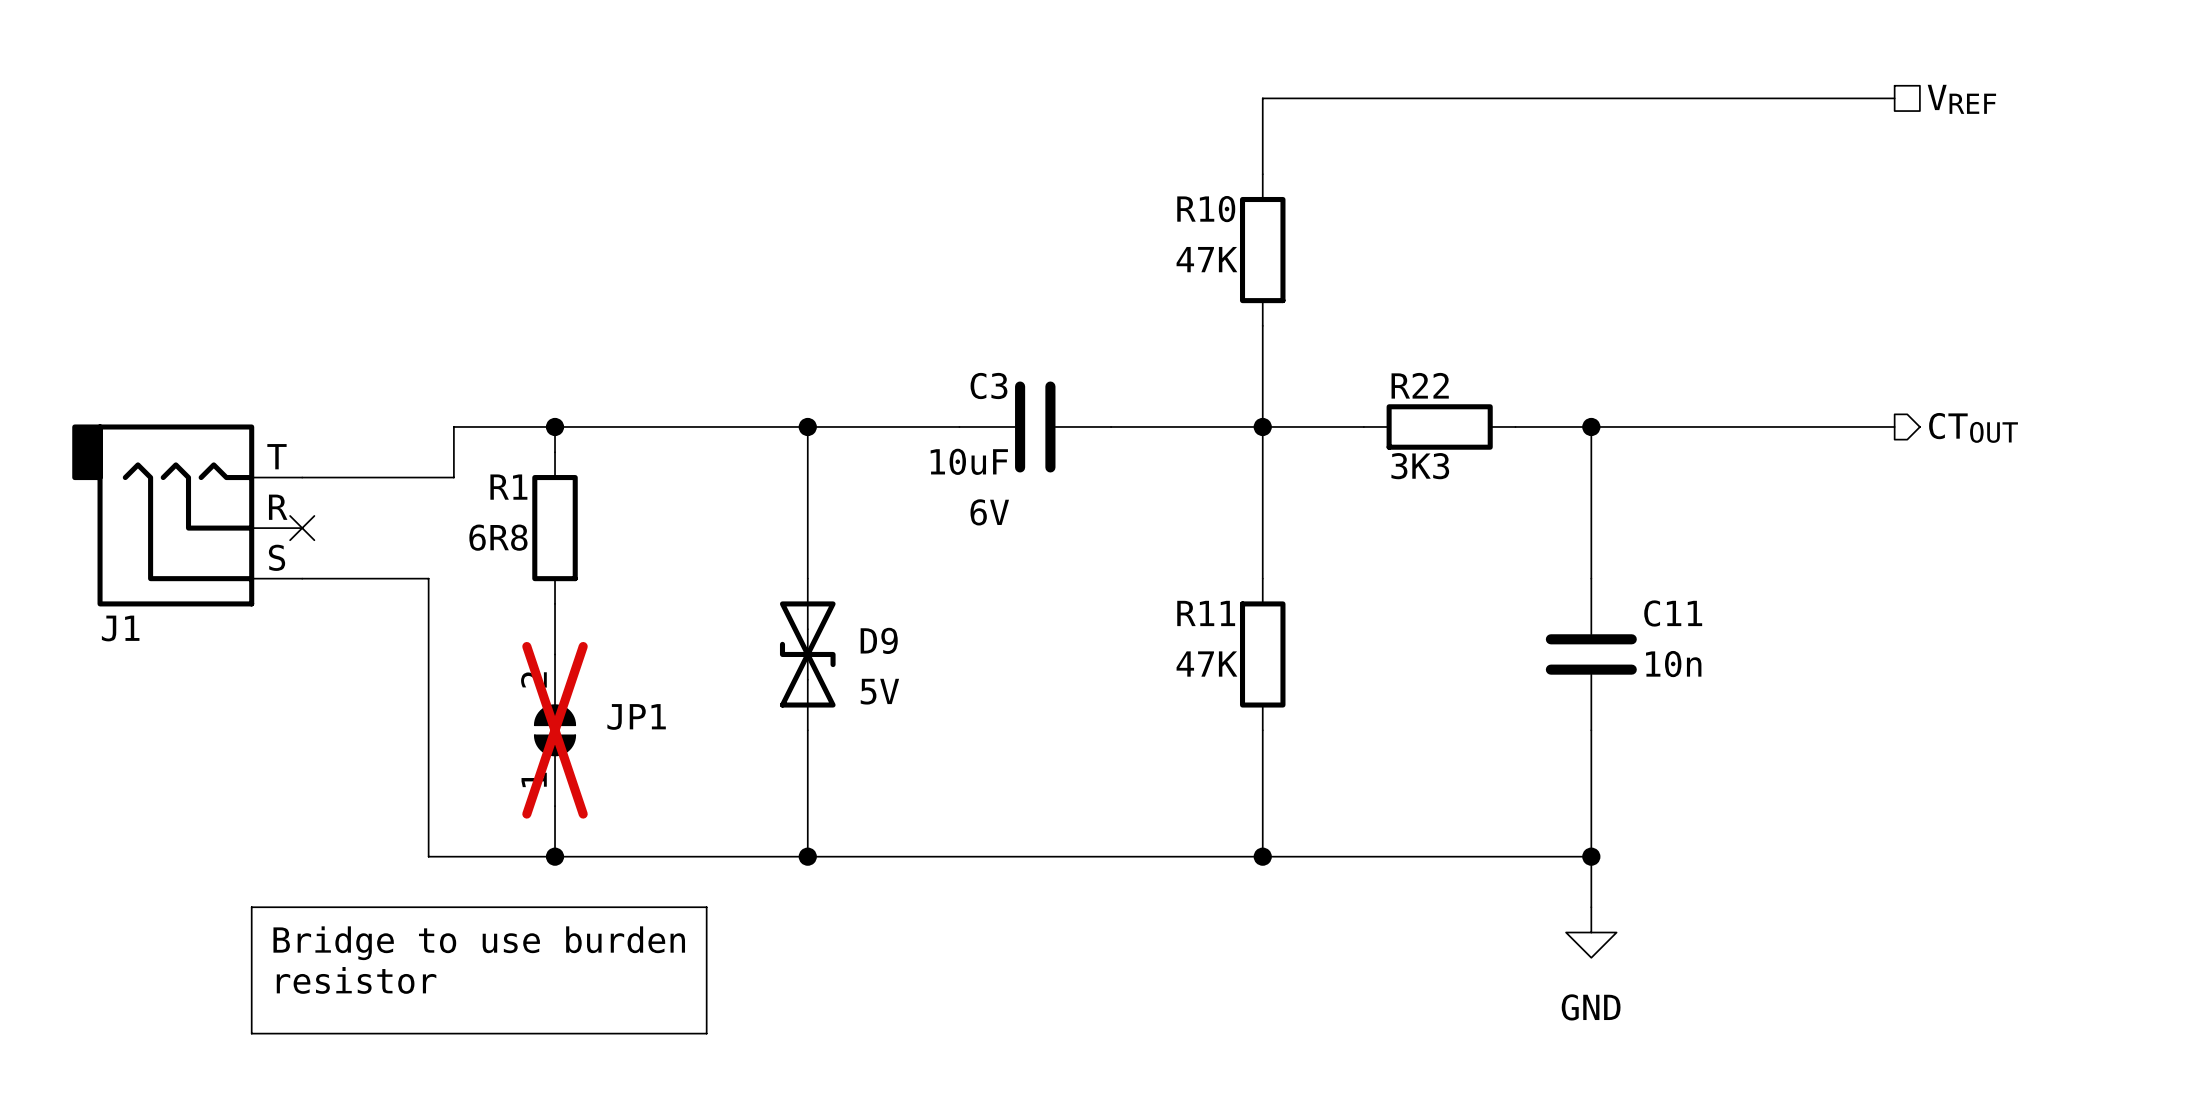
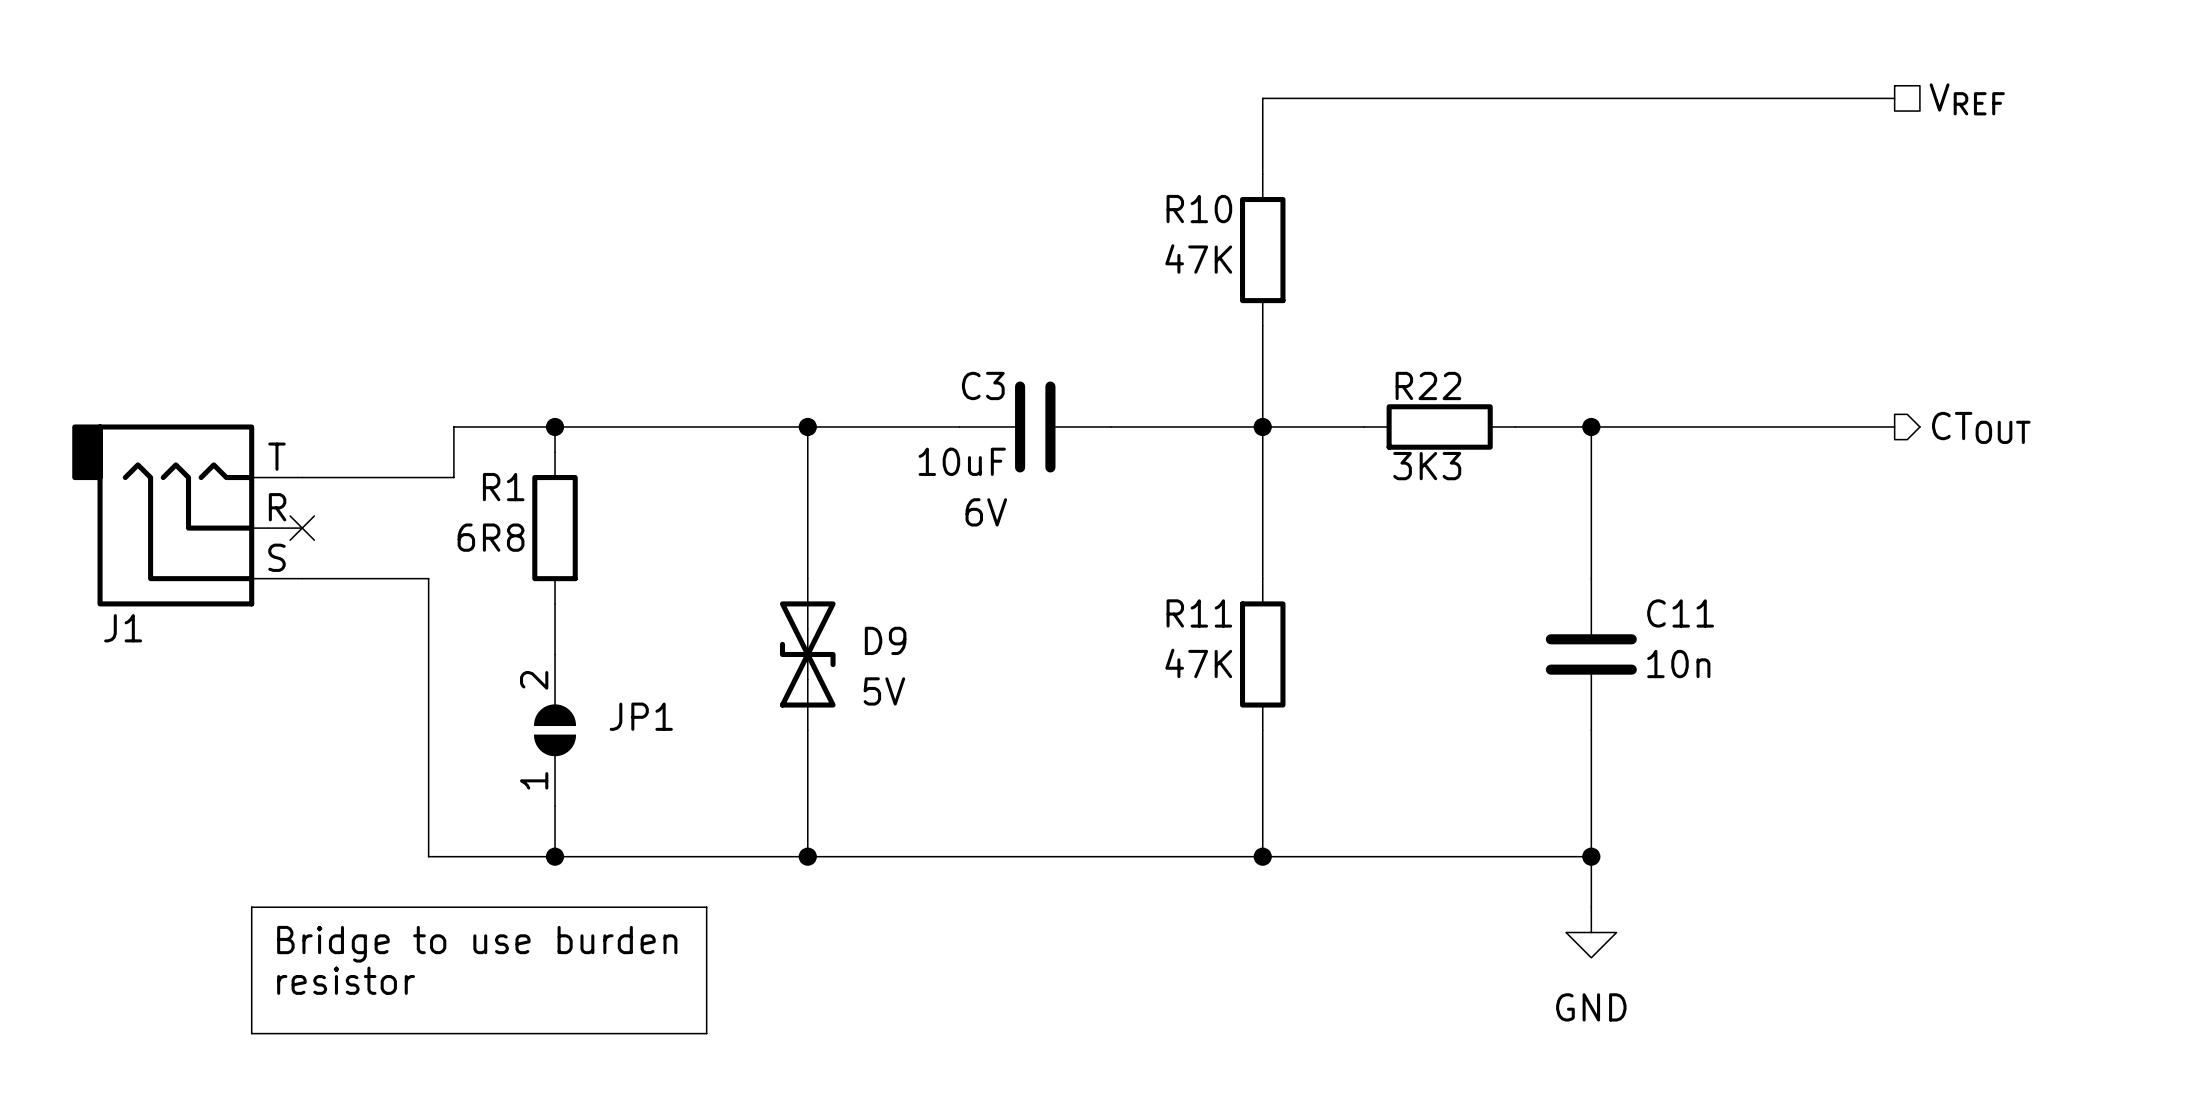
JP1 do-not-place cross: (555, 730) -> none

